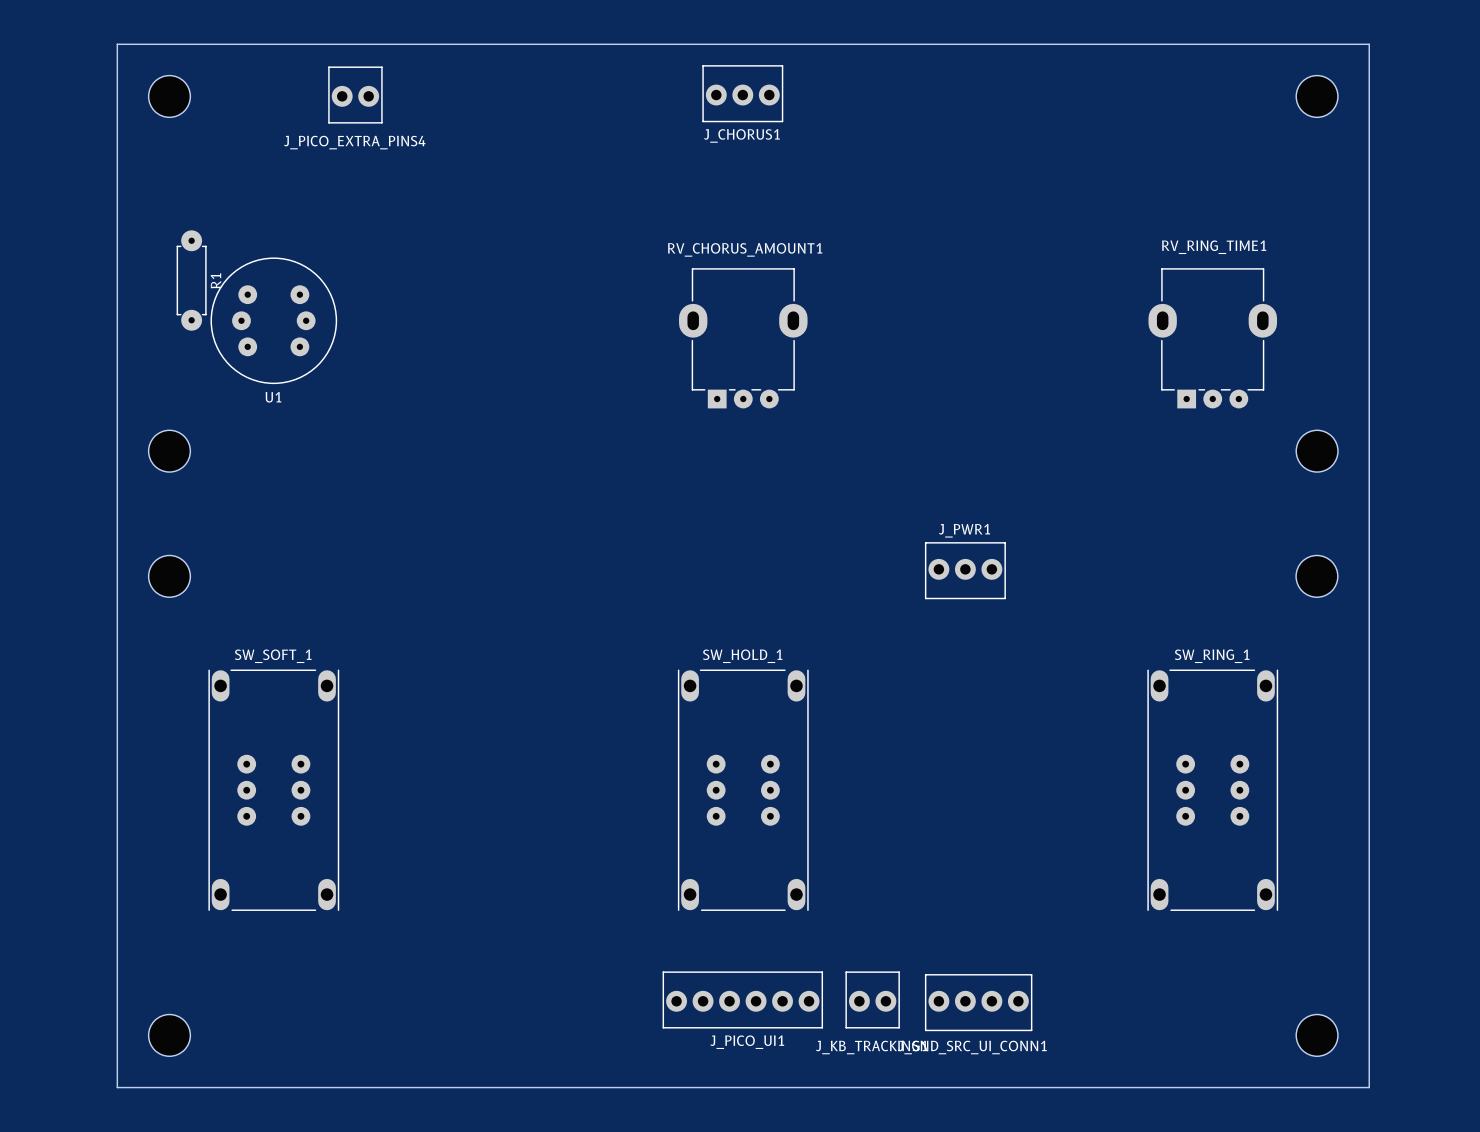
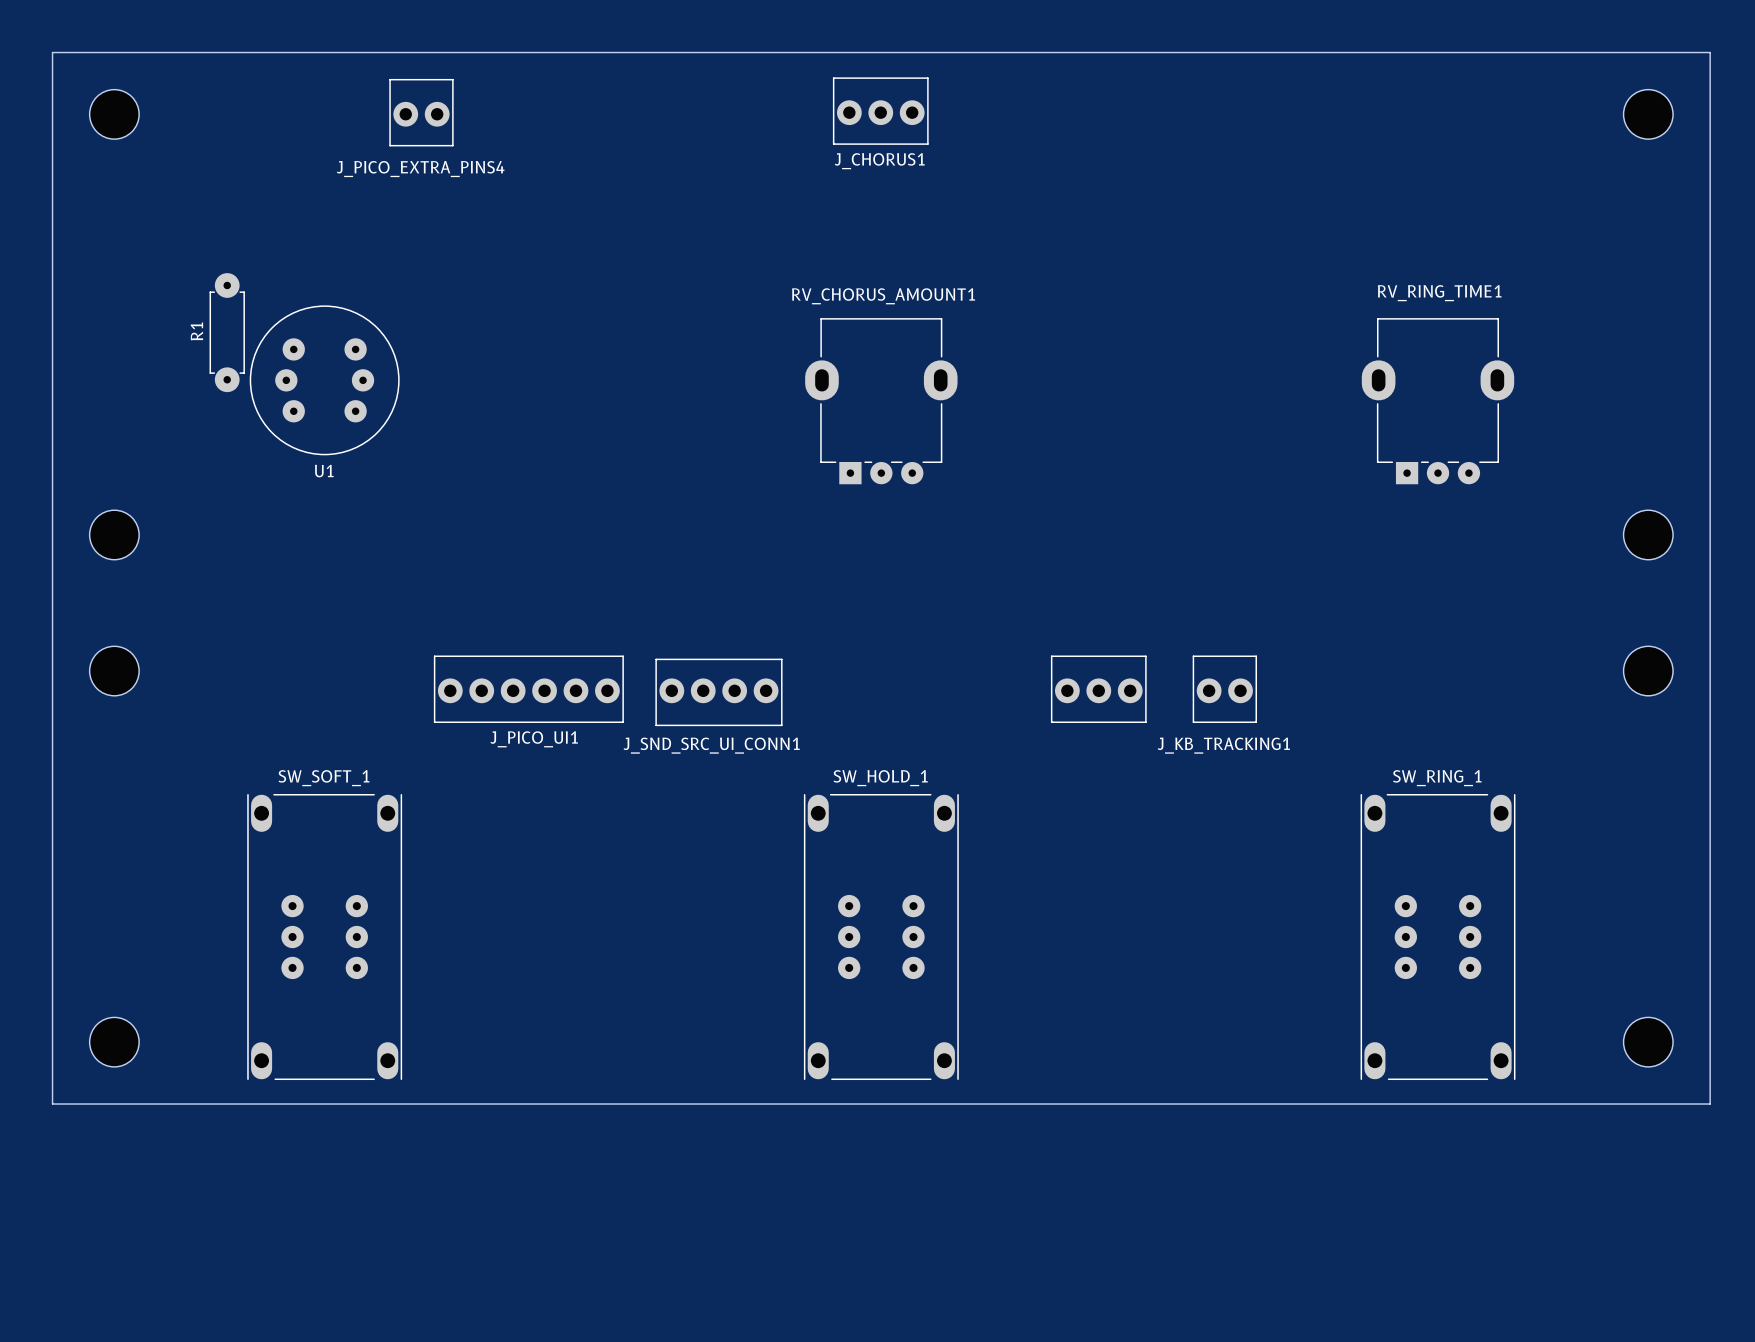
board edge: (117, 44) (117, 1087) (1369, 1087) (1369, 44) -> (139, 52) (52, 52) (52, 1104) (1710, 1104) (1710, 52) (1623, 52)
part position: (169, 96) -> (114, 114)
part position: (1317, 96) -> (1648, 114)
R1 name position: R1 (215, 280) -> R1 (196, 331)
part: none -> (114, 534)
part: (169, 451) -> none
part: (1317, 451) -> none
part: none -> (1648, 534)
part: none -> (114, 671)
part: none -> (1648, 671)
J_PWR1: (965, 570) -> none
part: (169, 576) -> none
part: (1316, 576) -> none
part: none -> (1098, 689)
part: none -> (114, 1042)
part: none -> (1648, 1042)
J_PICO_UI1 position: (742, 999) -> (528, 689)
J_KB_TRACKING1 position: (872, 999) -> (1224, 689)
J_SND_SRC_UI_CONN1 position: (978, 1002) -> (718, 692)
part: (169, 1035) -> none
part: (1317, 1035) -> none

